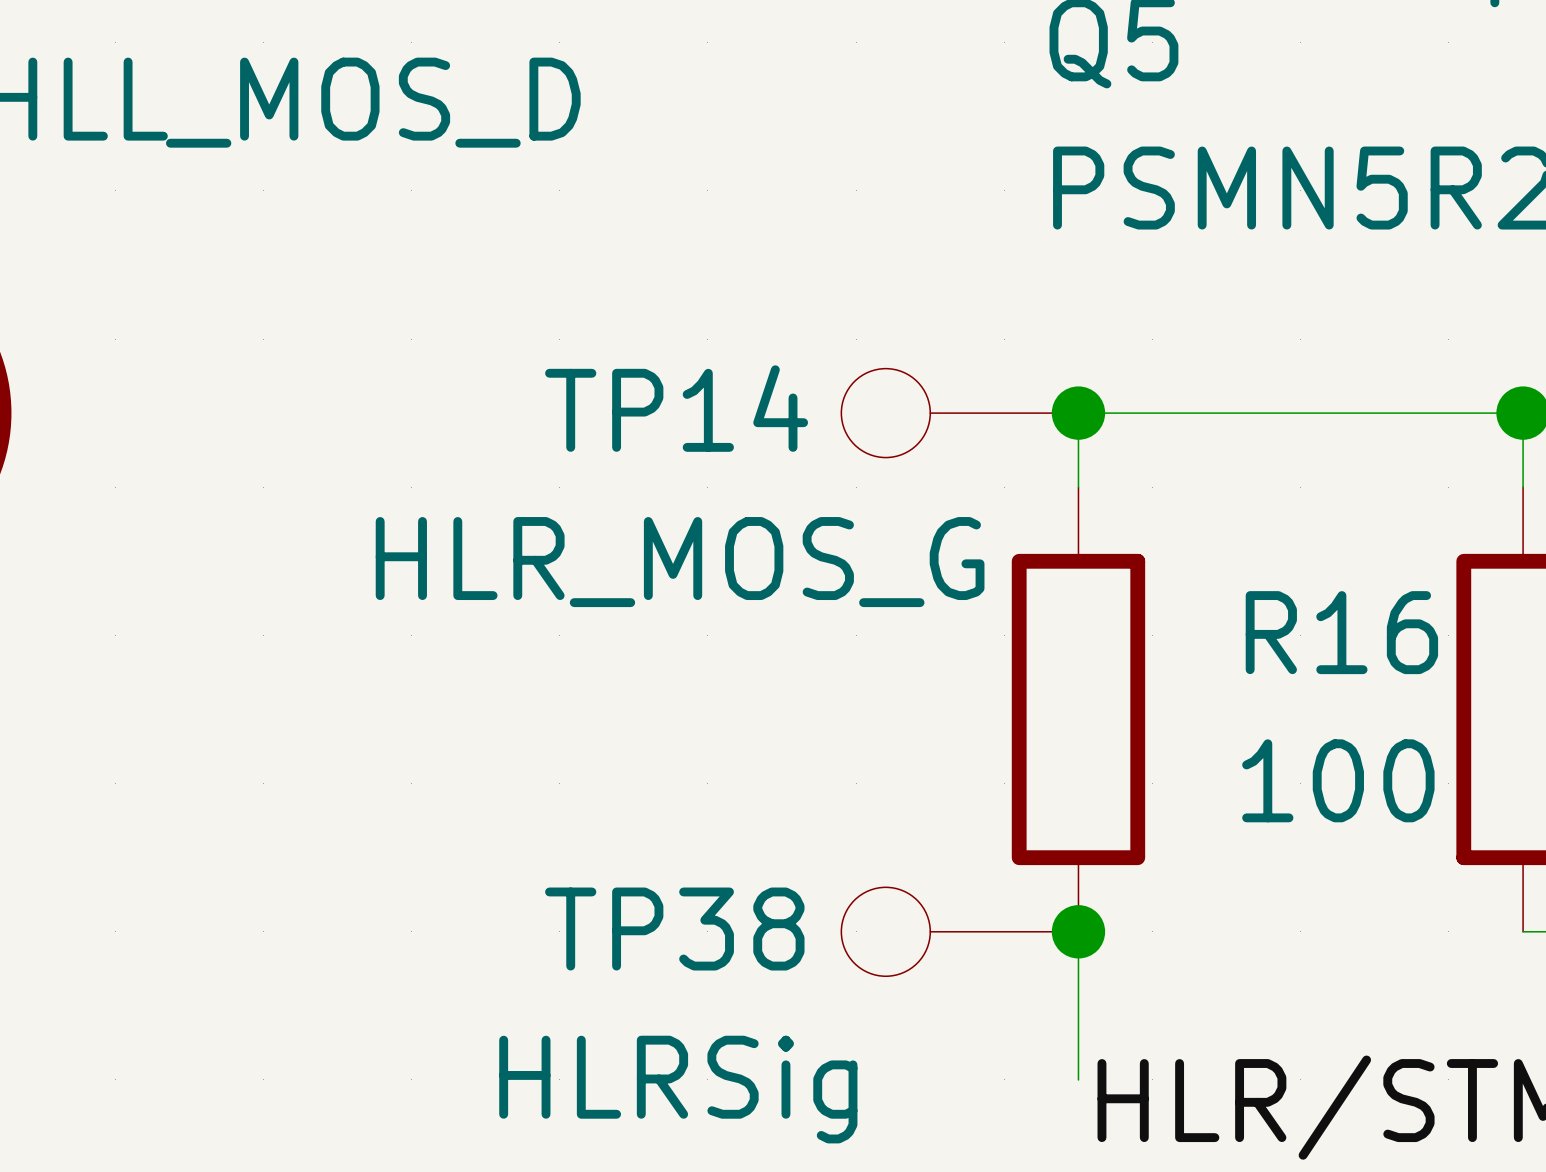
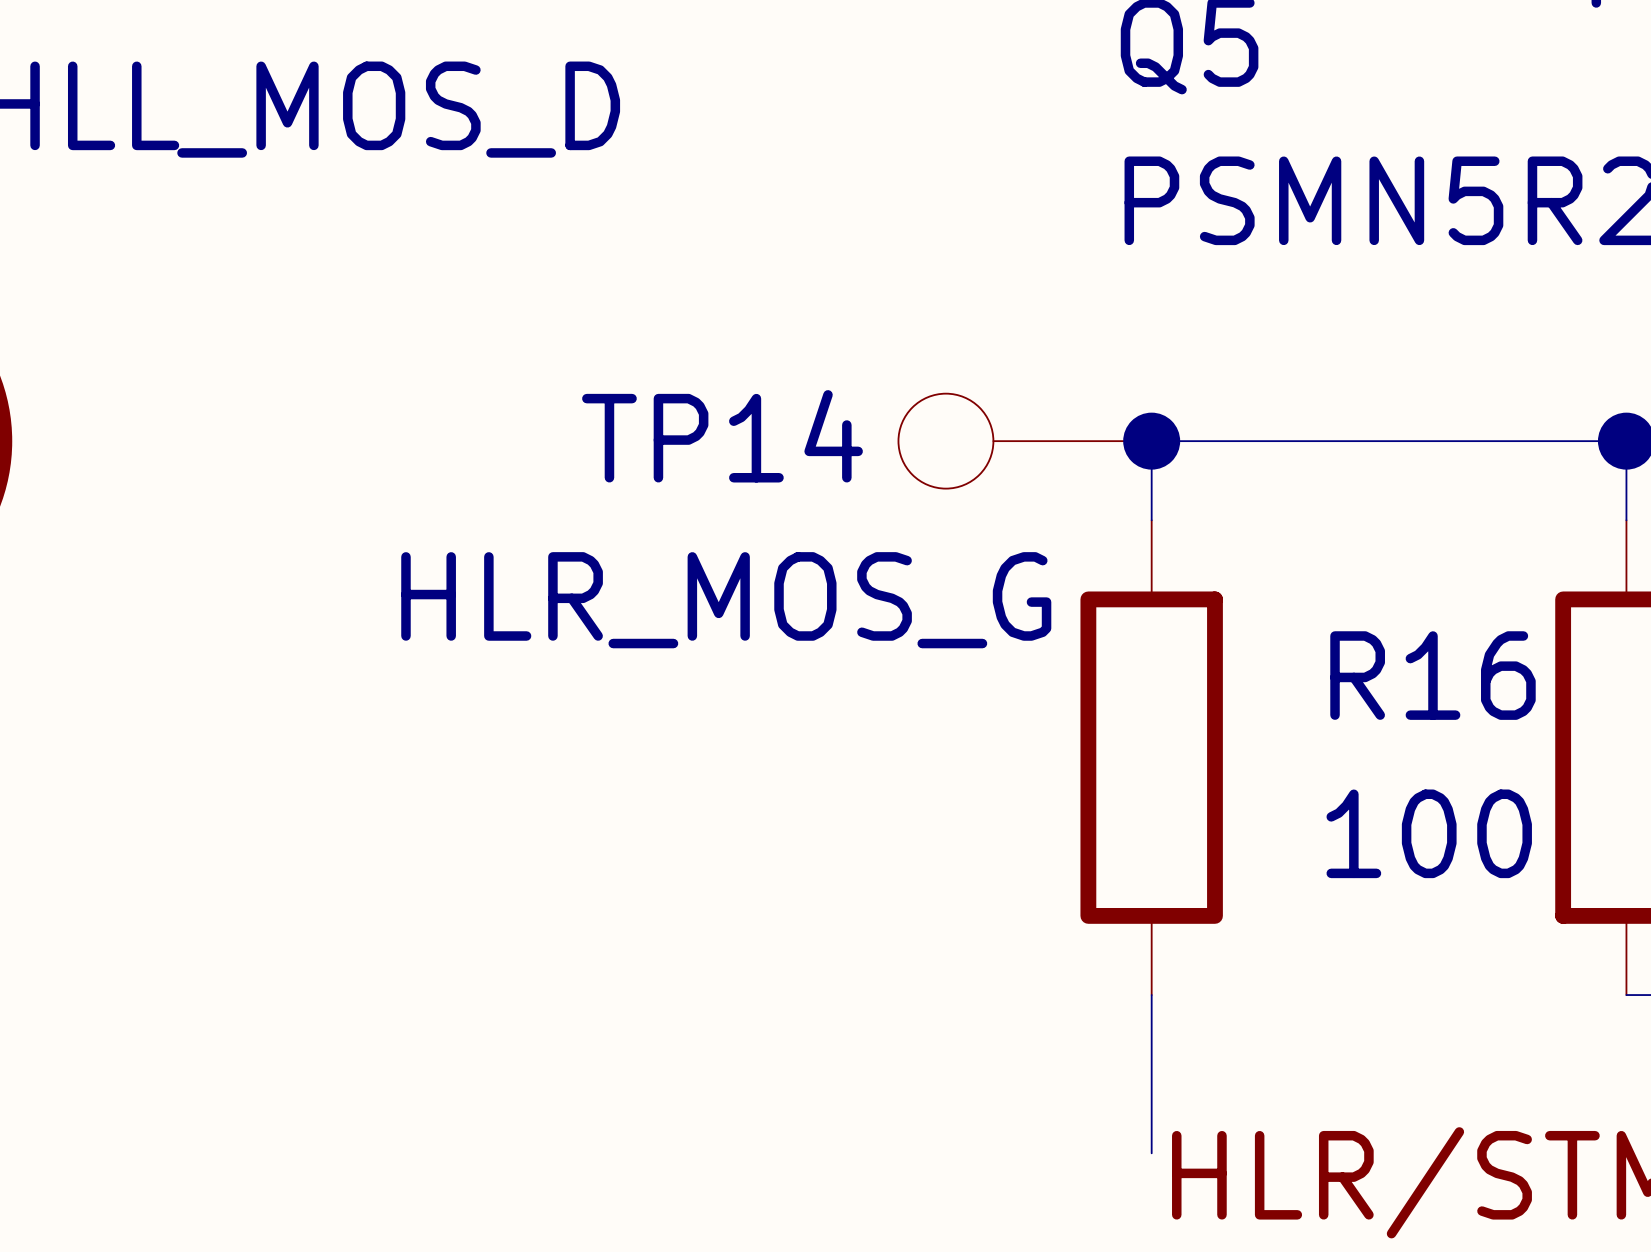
TP38: HLRSig (959, 931) -> none
junction: (1078, 931) -> none

